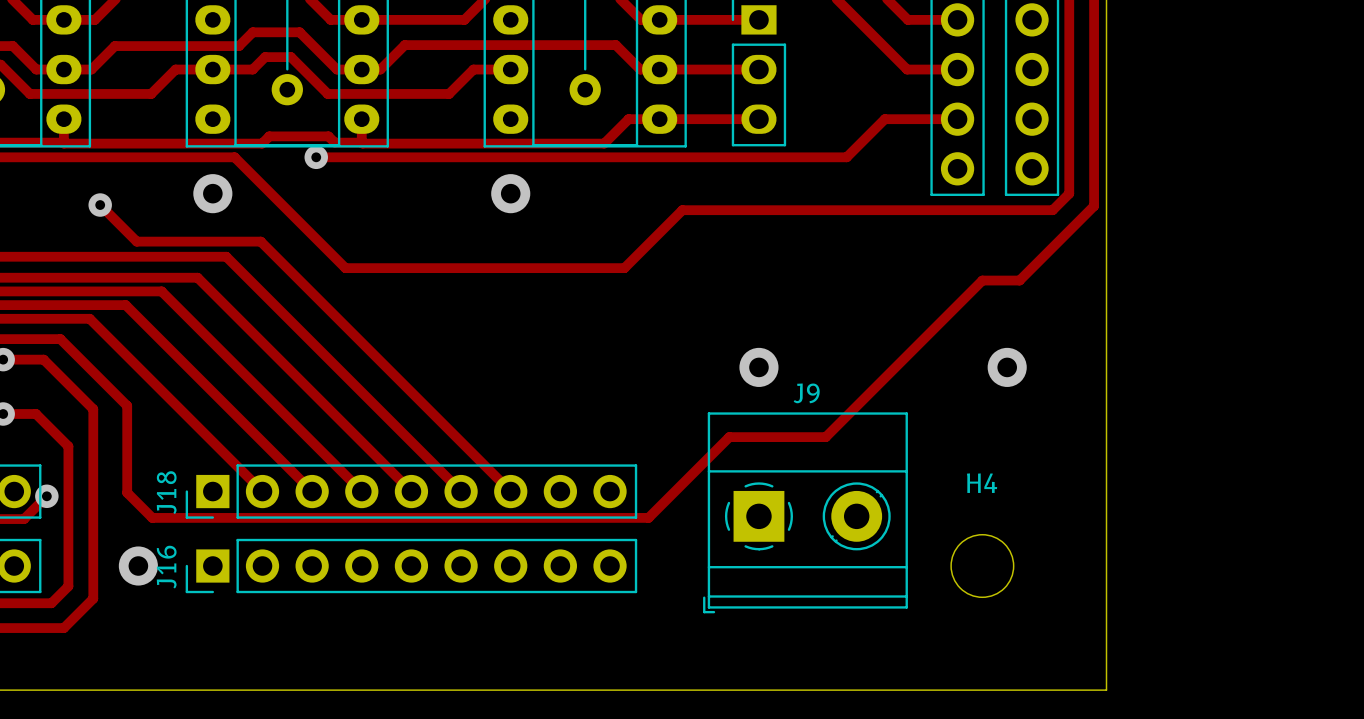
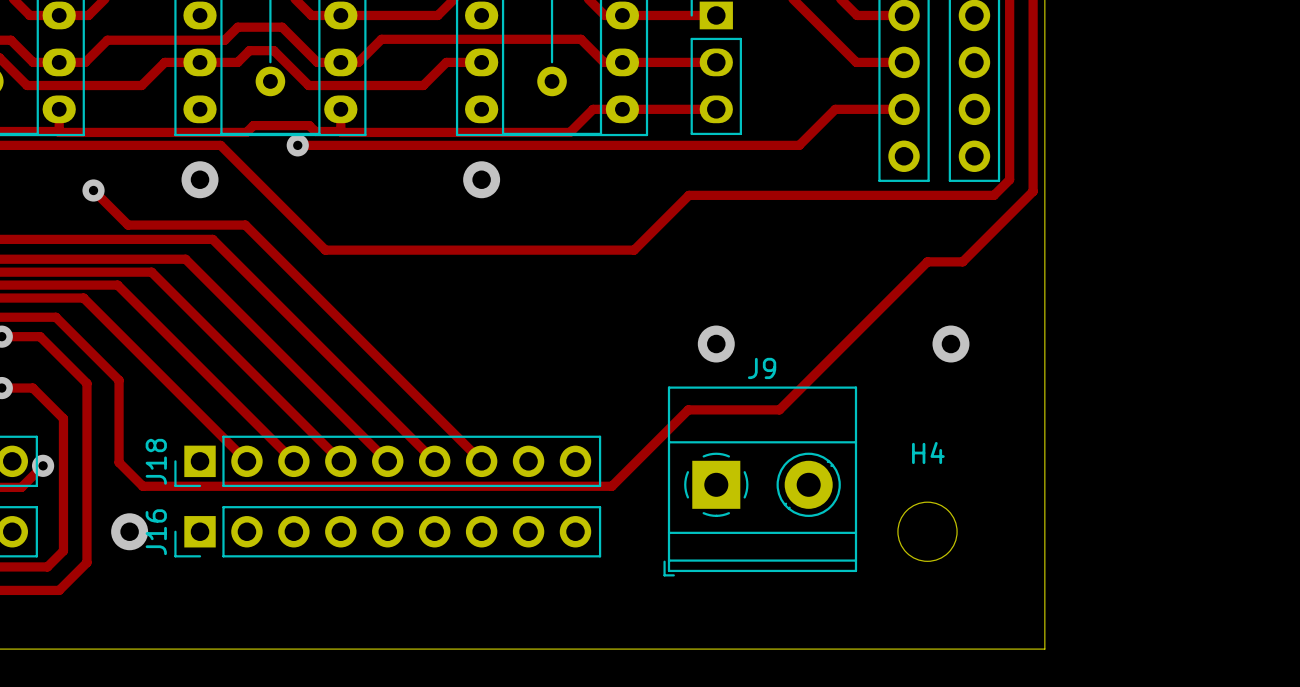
track: (730, 210) (682, 210) (624, 268) -> (688, 195) (634, 250) (589, 250)

